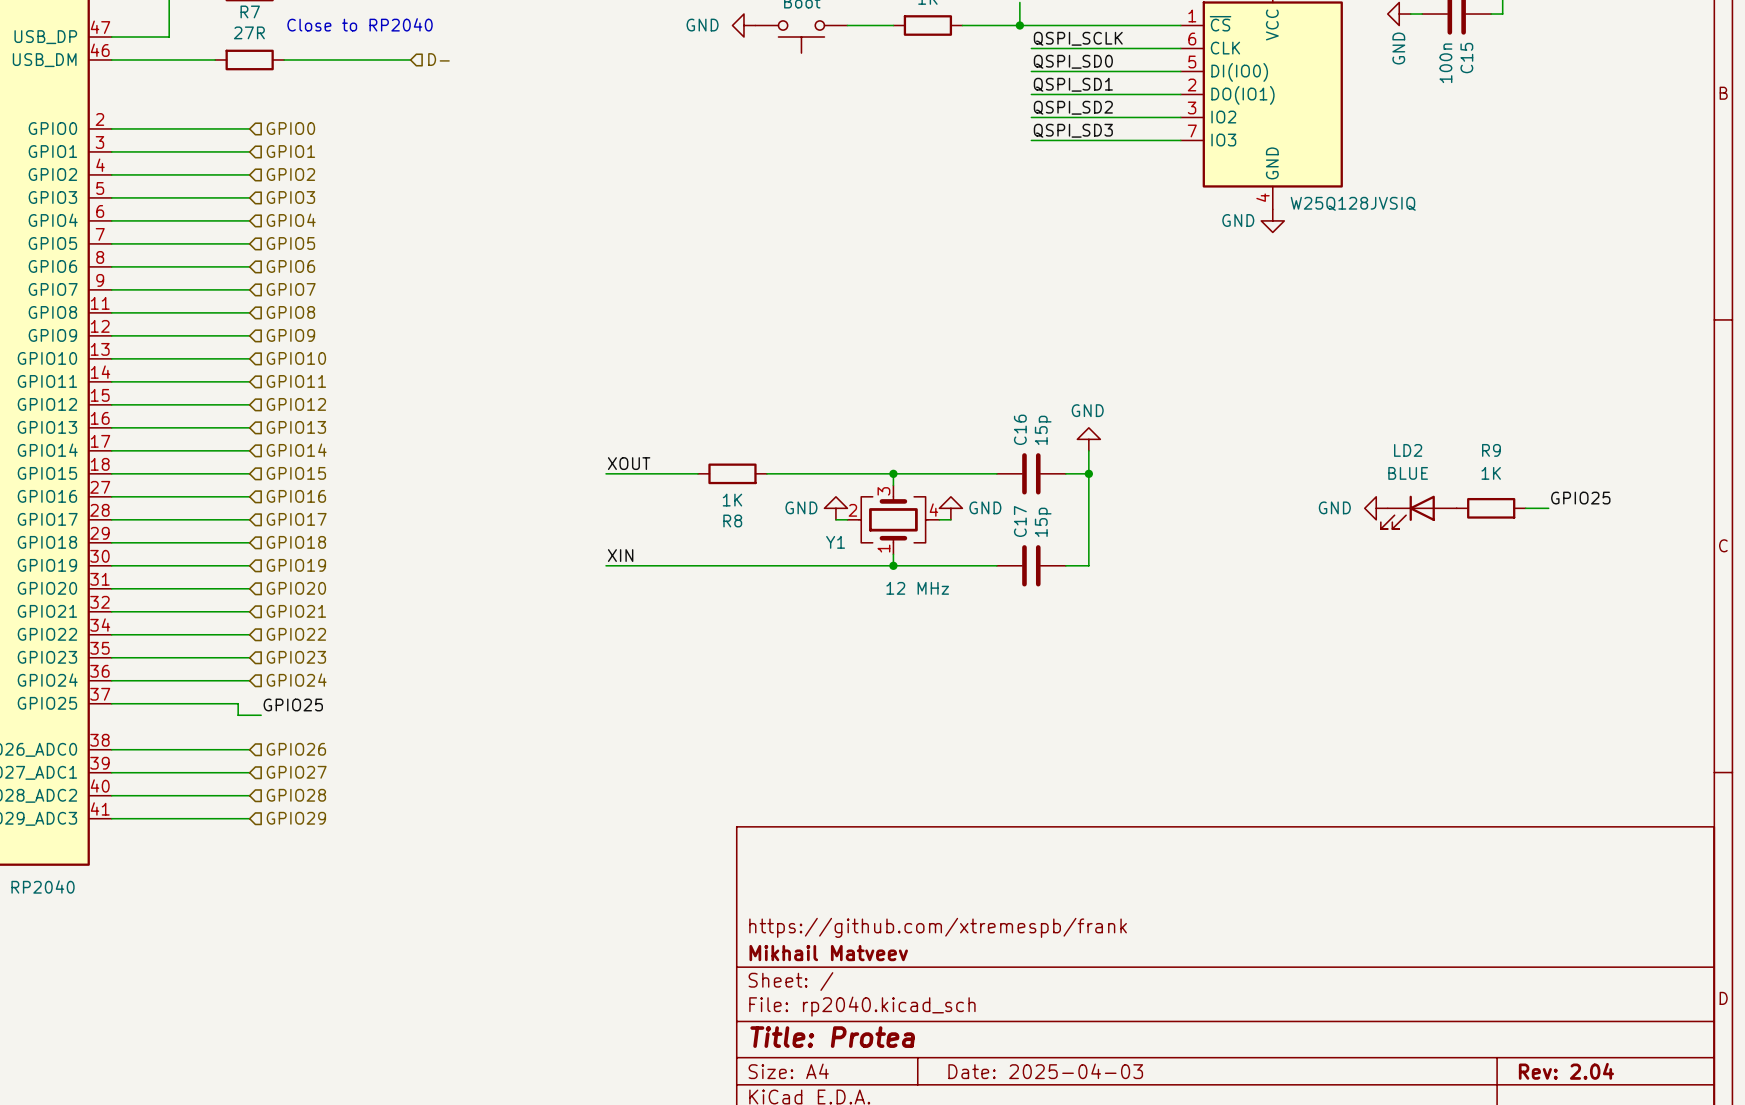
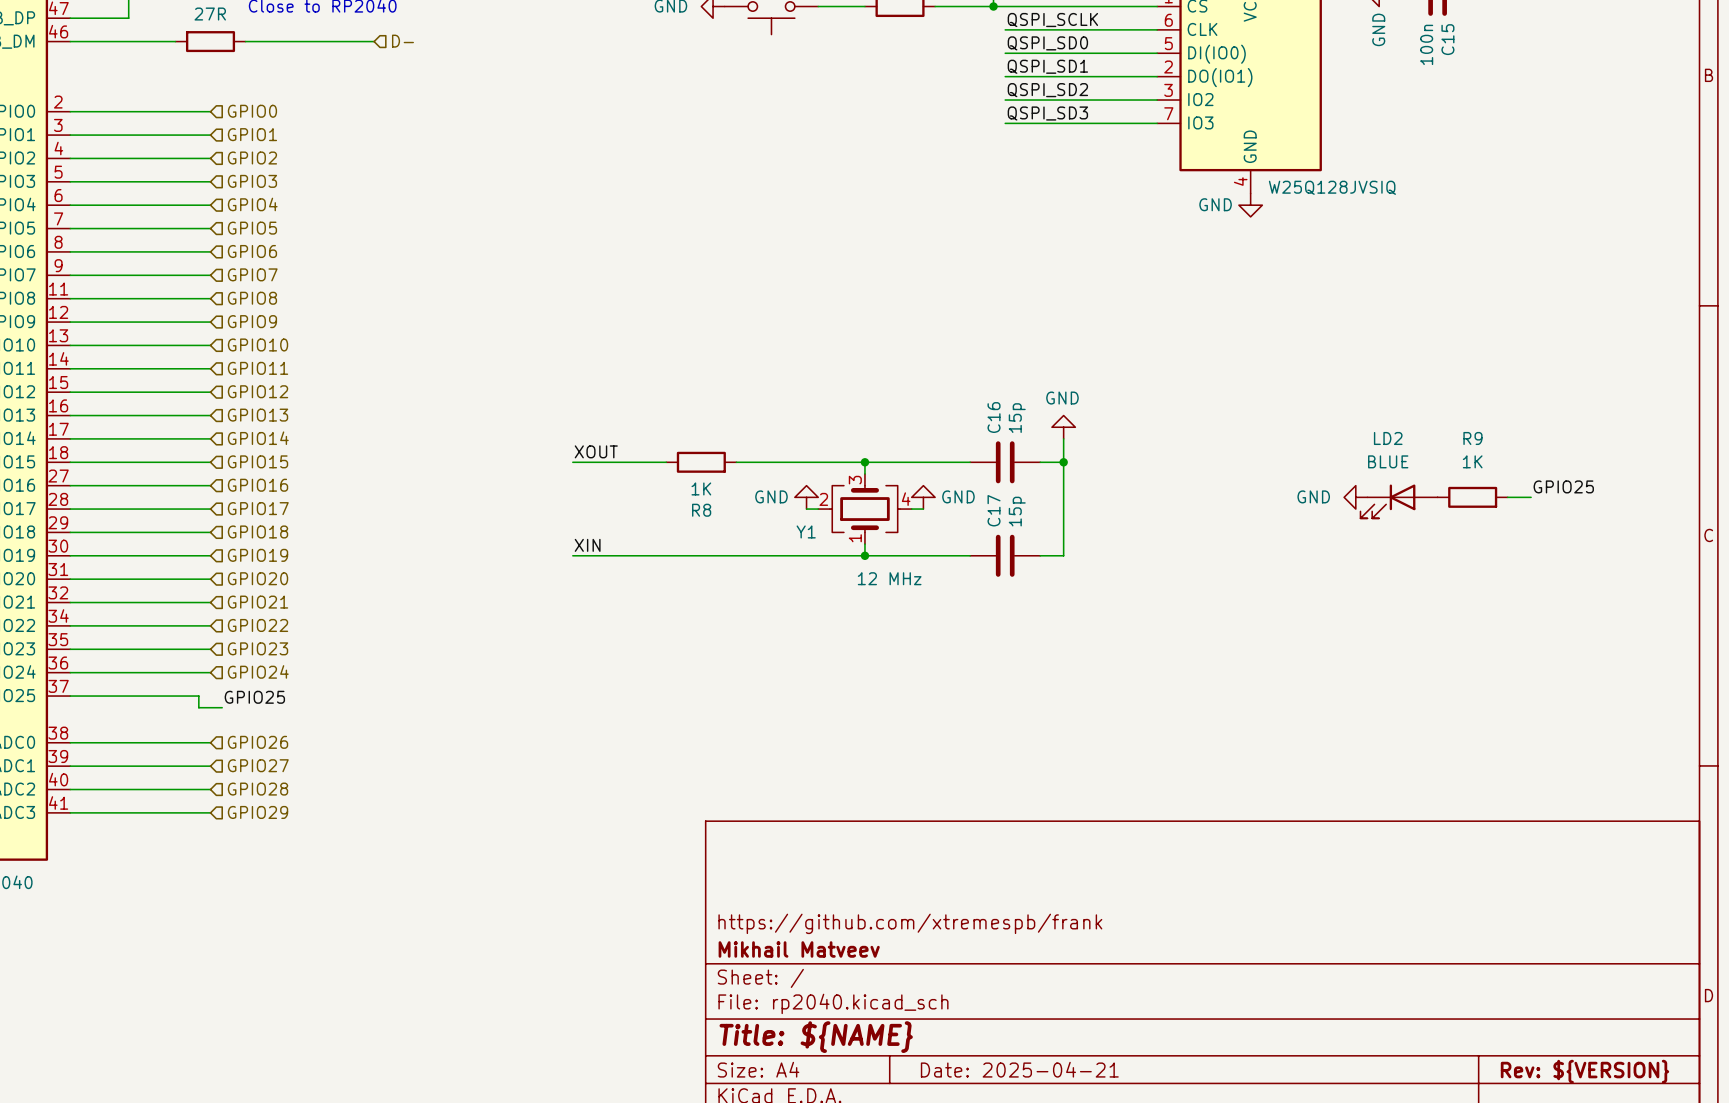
title block: Title: Protea (832, 1037) -> Title: ${NAME} (816, 1037)
title block: Date: 2025-04-03 (1045, 1071) -> Date: 2025-04-21 (1019, 1069)
title block: Rev: 2.04 (1566, 1071) -> Rev: ${VERSION} (1584, 1071)

